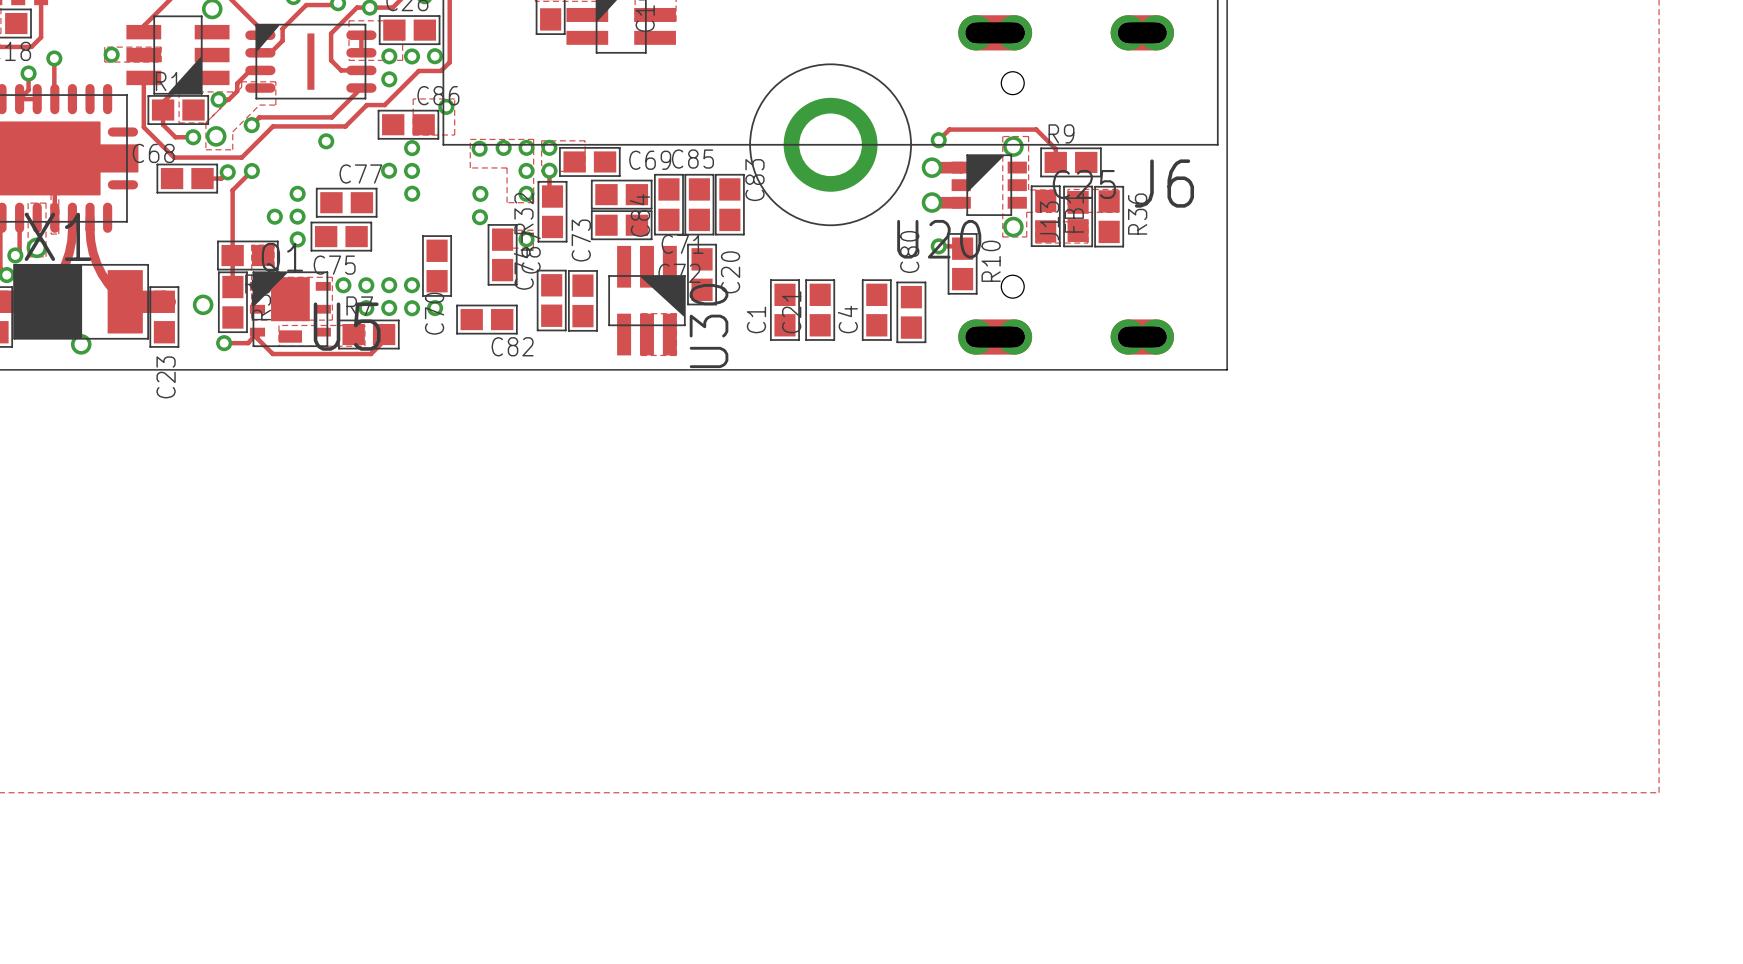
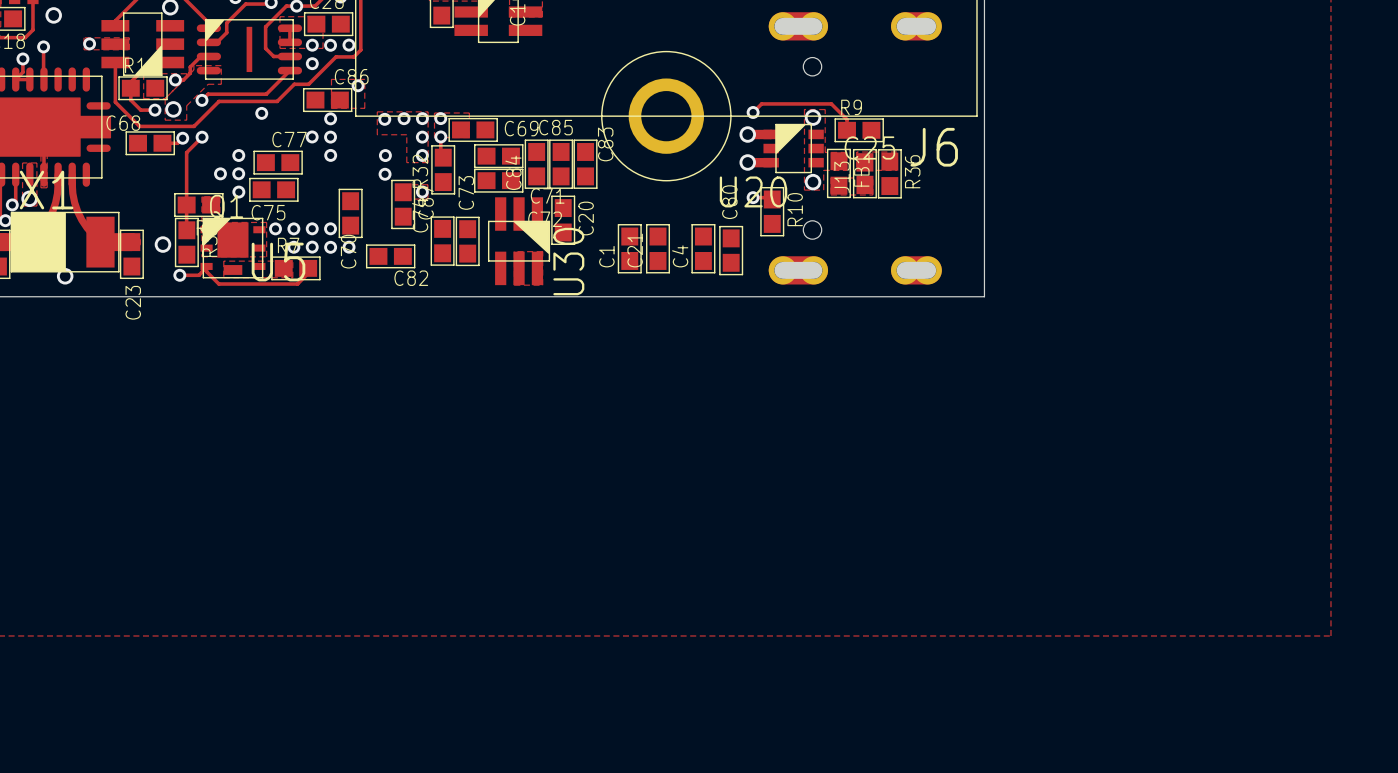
via: none -> (53, 15)

